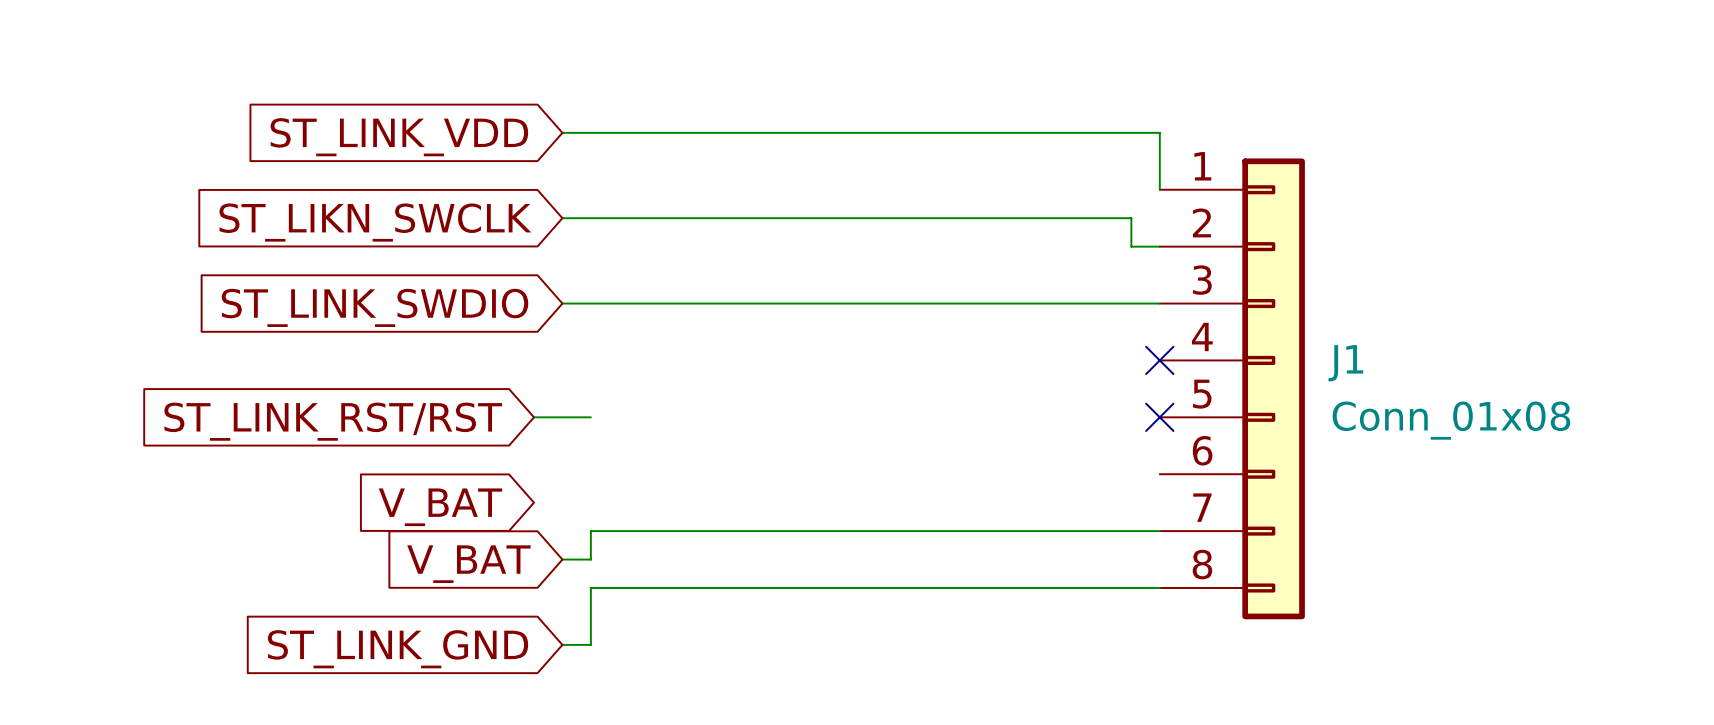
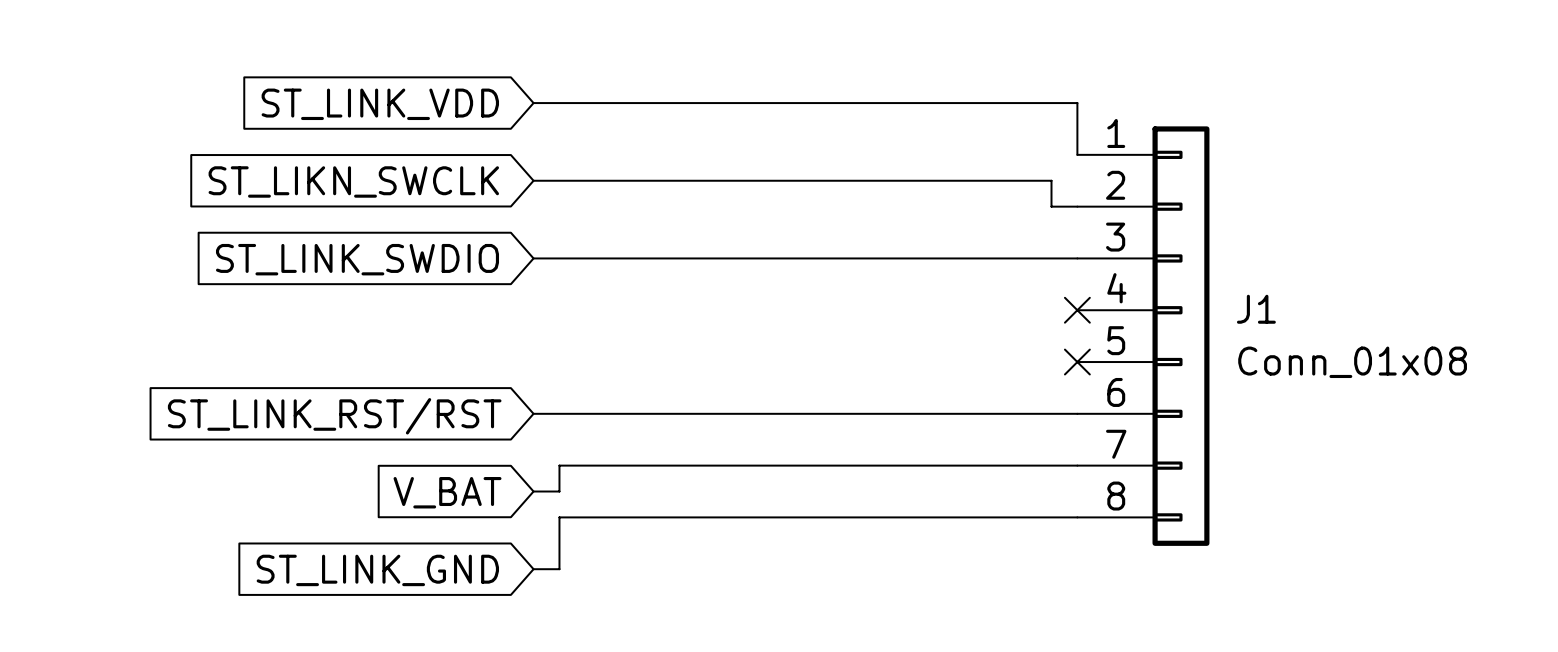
wire: (533, 417) (590, 417) -> none
global label position: ST_LINK_RST/RST (333, 421) -> ST_LINK_RST/RST (334, 416)
wire: none -> (533, 413) (1077, 413)
global label: V_BAT (440, 507) -> none

